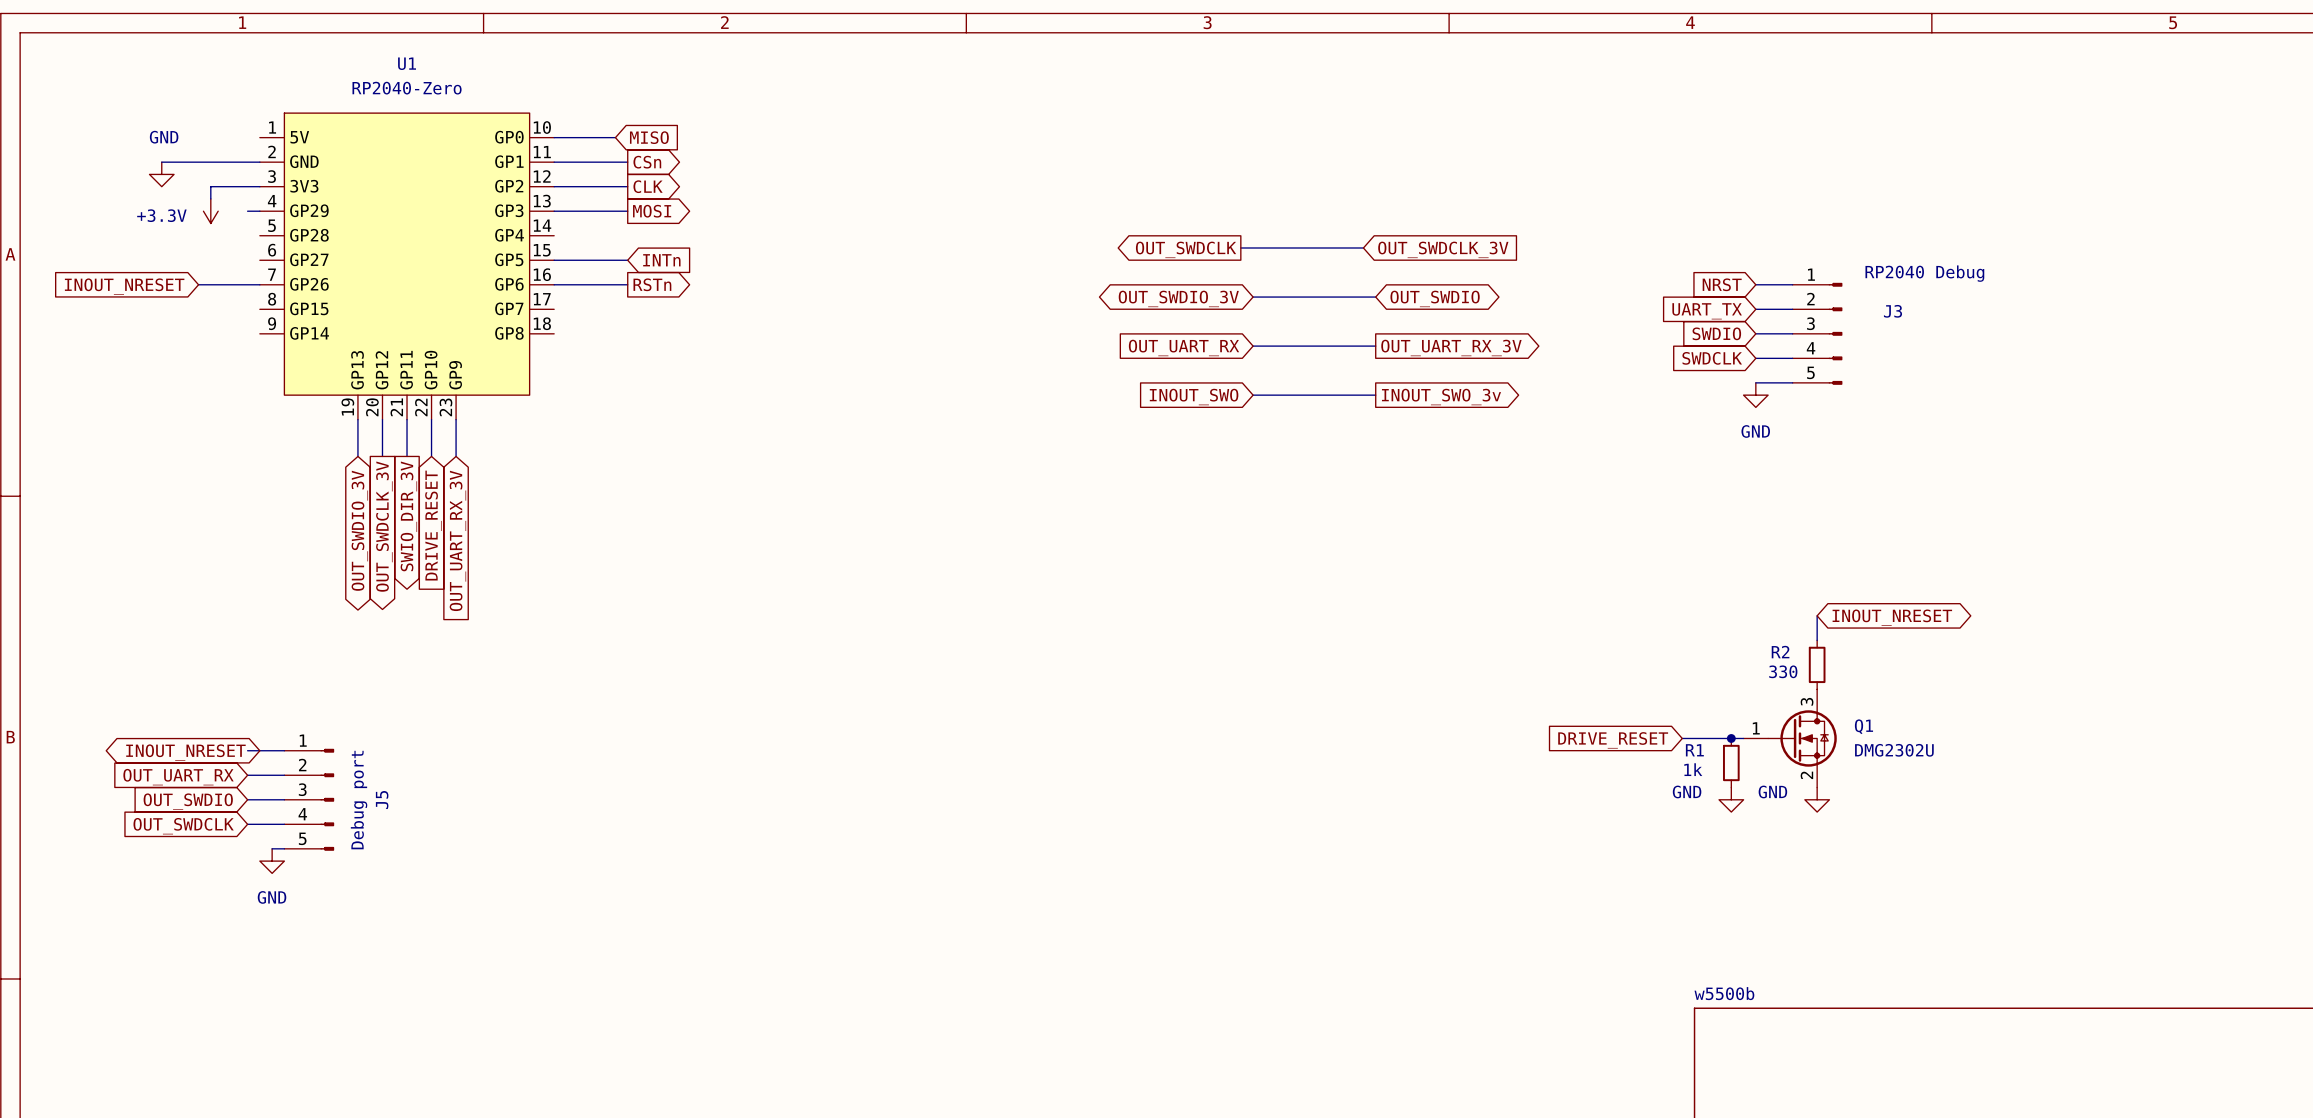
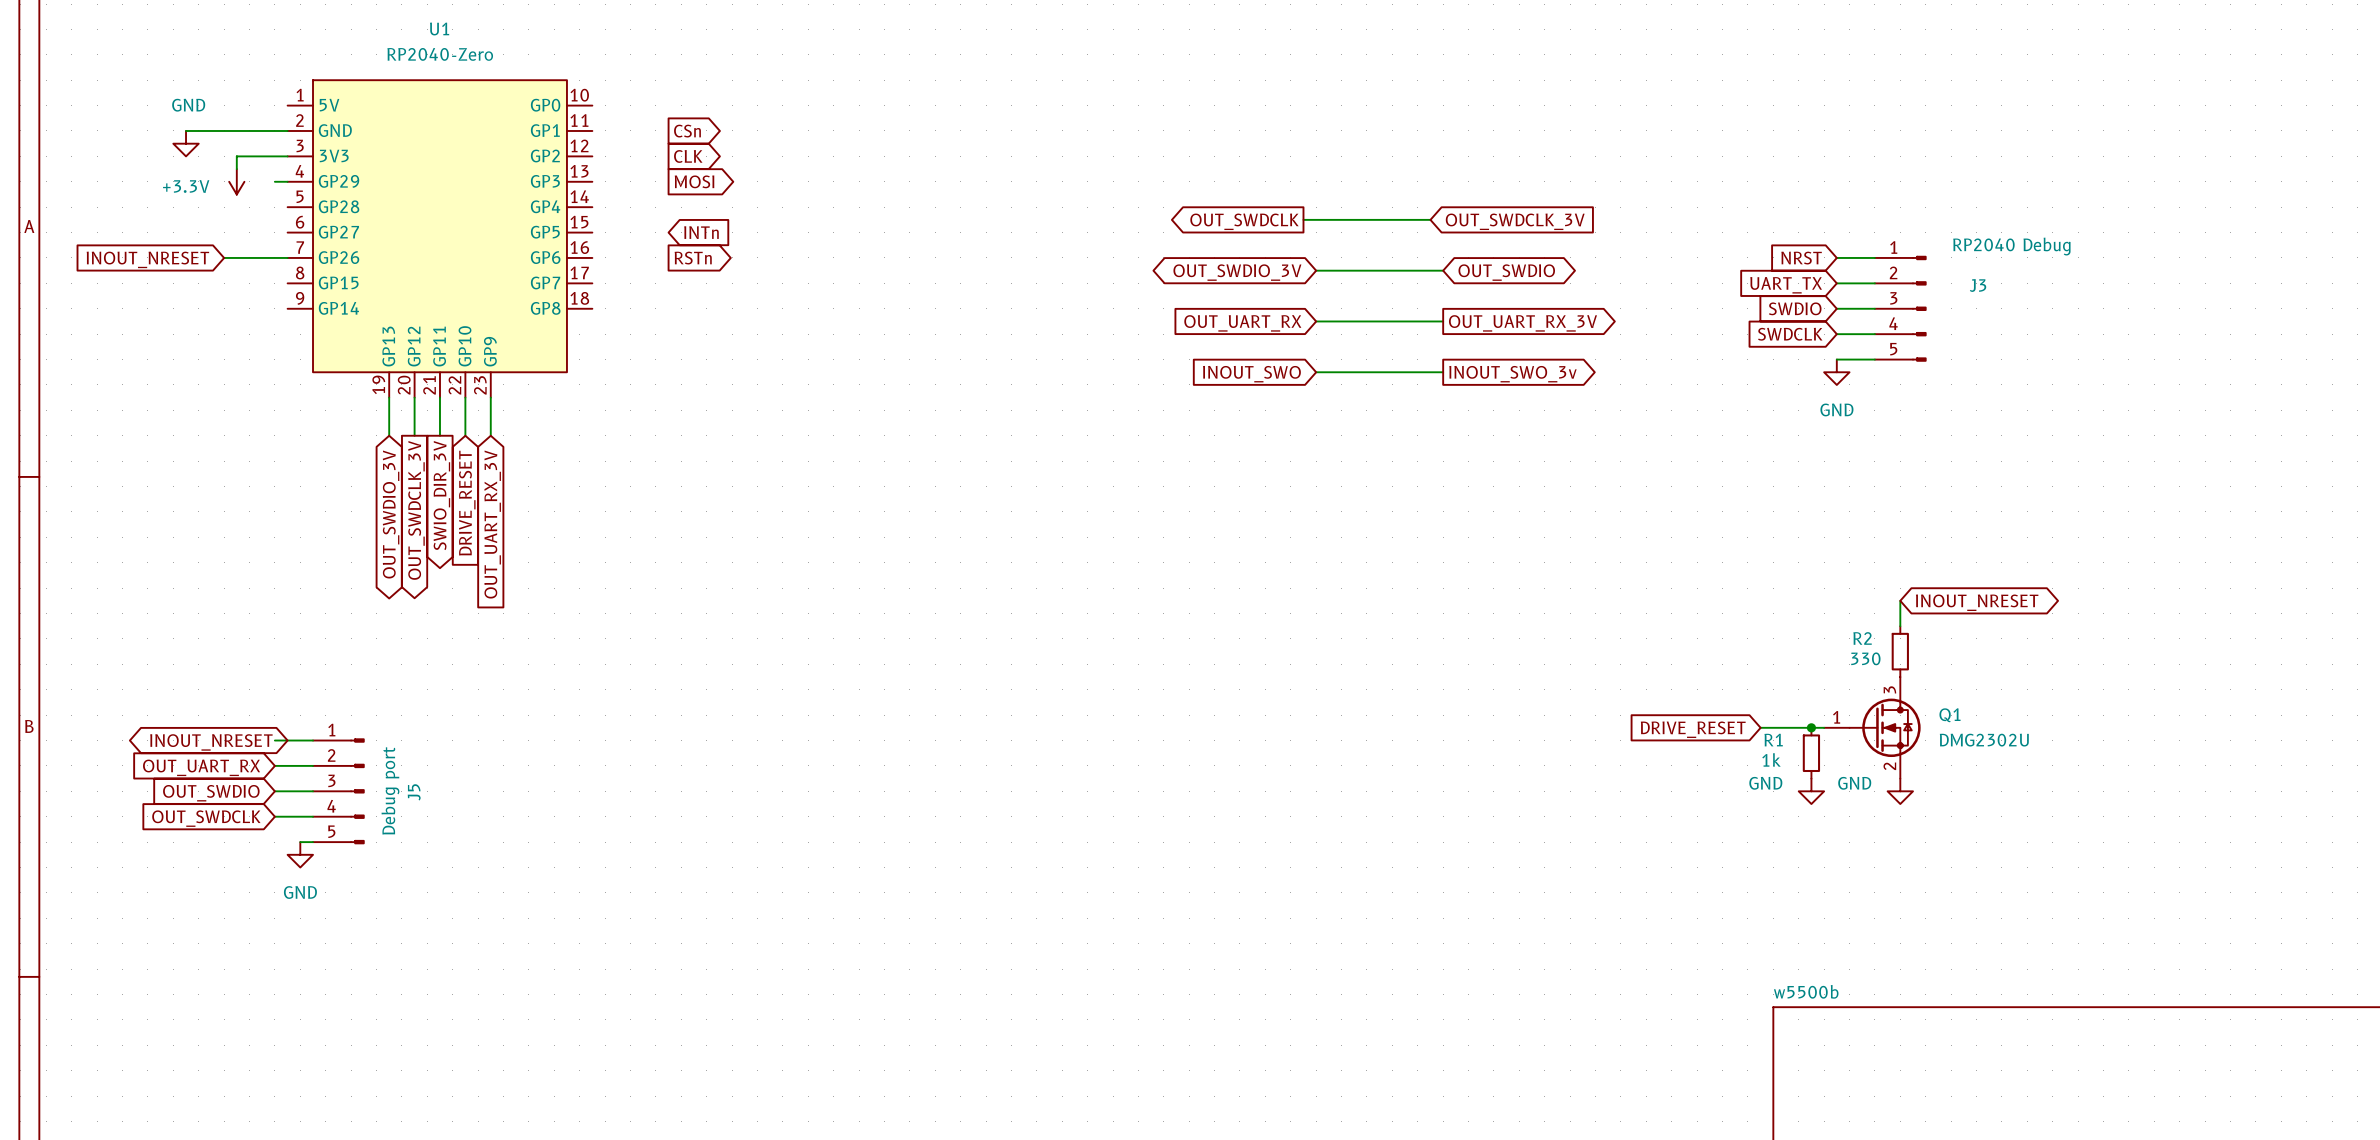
wire: (554, 137) (615, 137) -> none
global label: MISO (649, 137) -> none
wire: (554, 162) (627, 162) -> none
wire: (554, 186) (627, 186) -> none
wire: (554, 211) (627, 211) -> none
wire: (554, 260) (627, 260) -> none
wire: (554, 284) (627, 284) -> none

